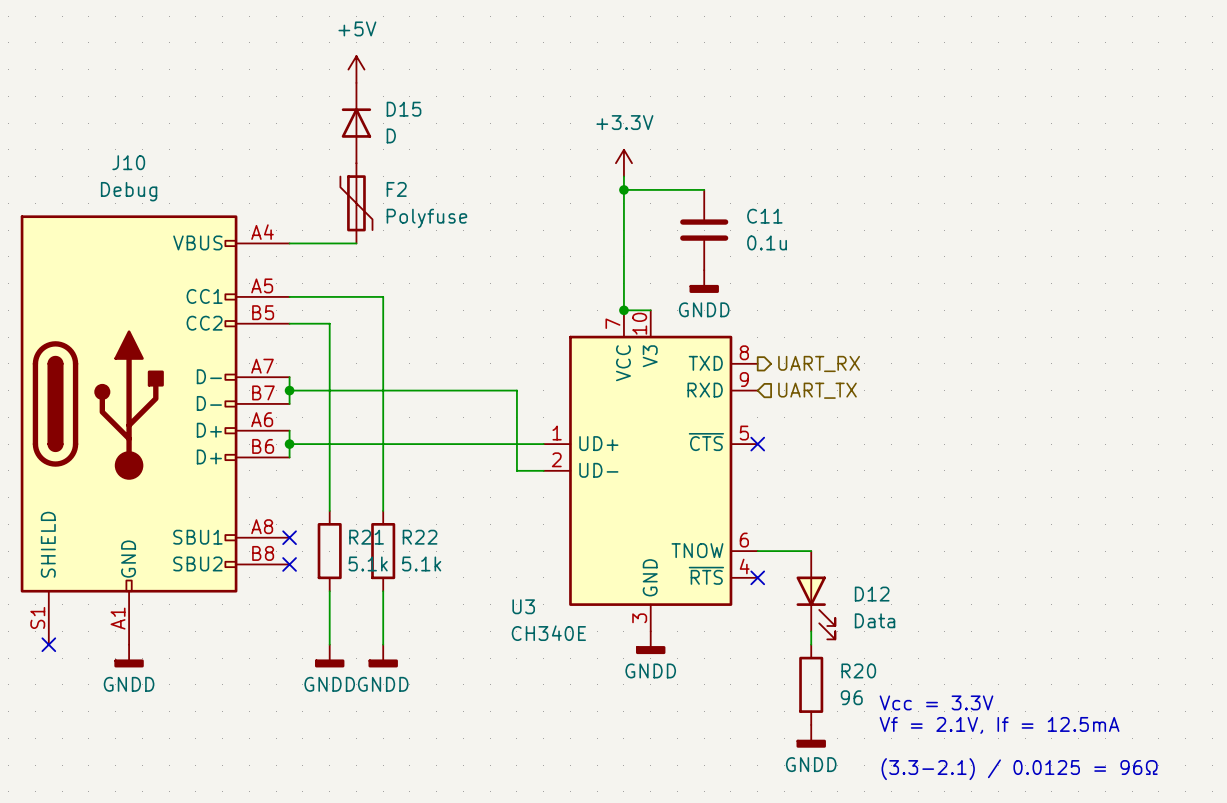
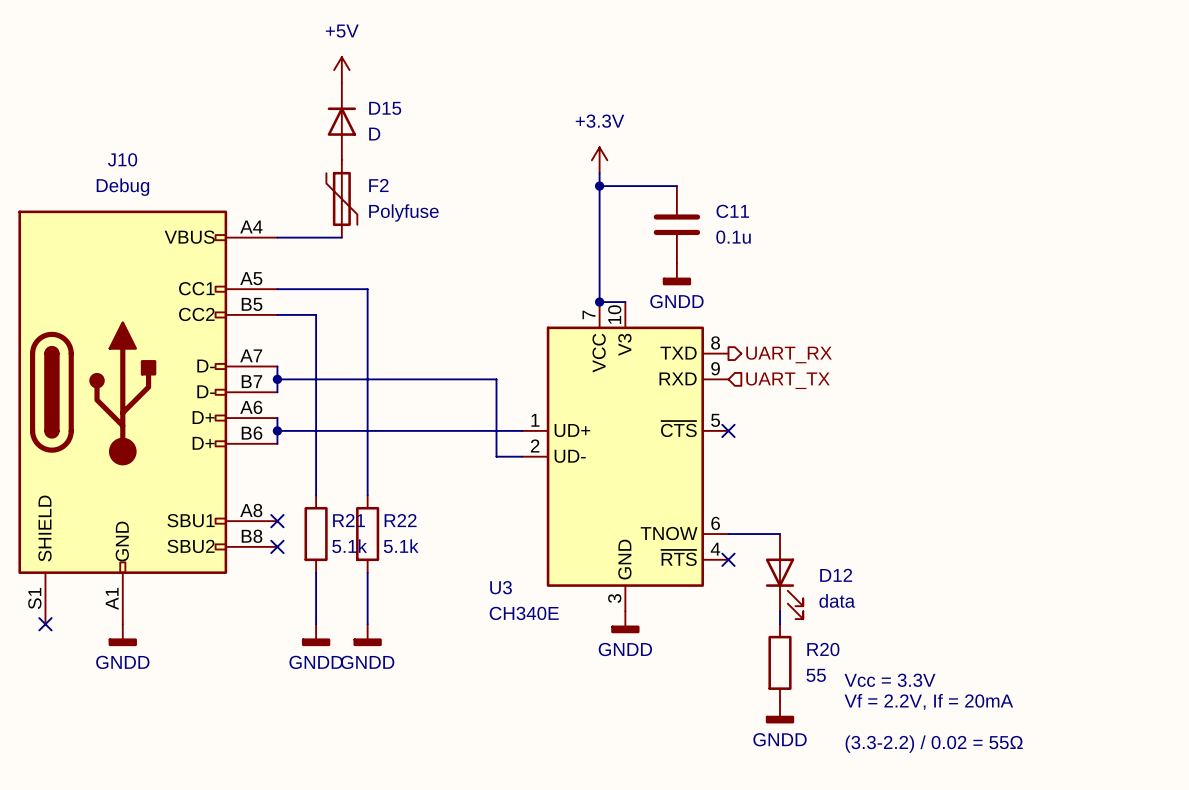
D12 symbol: [796, 551, 836, 640] -> [765, 534, 804, 620]
D12 value: Data (875, 620) -> data (837, 600)
R20 value: 96 (851, 697) -> 55 (816, 675)
text: Vf = 2.1V, If = 12.5mA (999, 725) -> Vf = 2.2V, If = 20mA (928, 701)
text: (3.3-2.1) / 0.0125 = 96Ω (1019, 769) -> (3.3-2.2) / 0.02 = 55Ω (934, 744)

